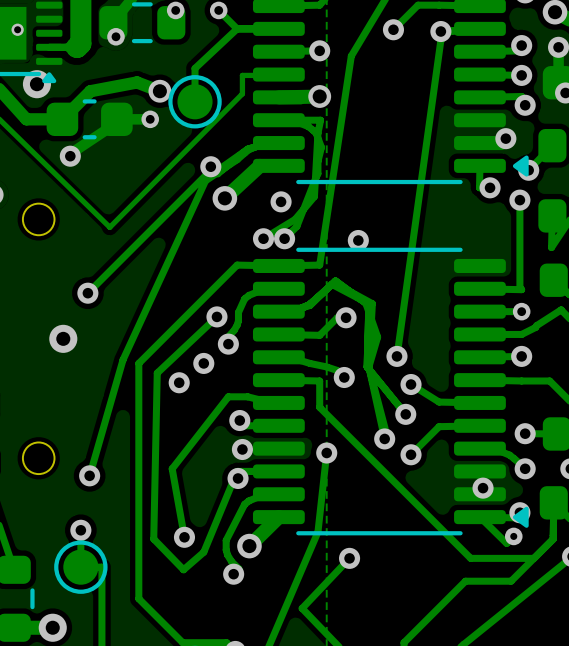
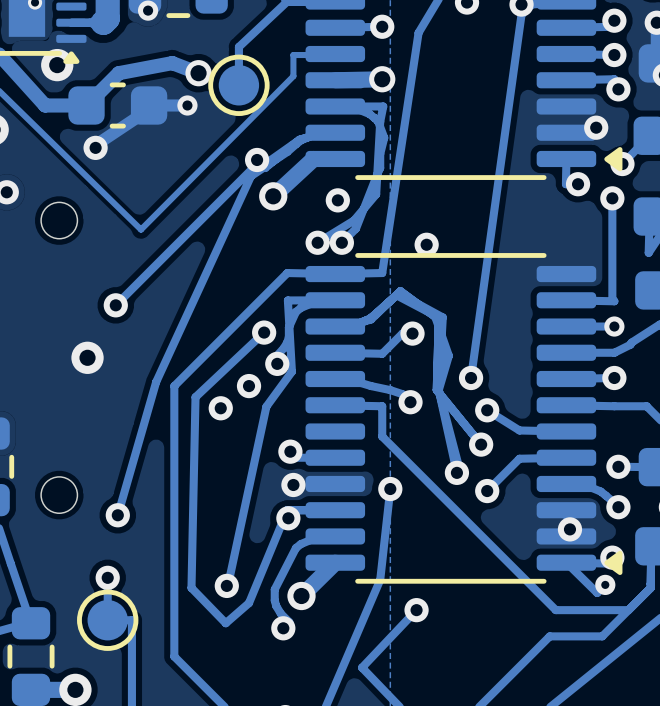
track: none -> (335, 300) (287, 300) (291, 371) (266, 406) (227, 588)
track: (278, 404) (247, 396) (228, 396) (172, 468) (184, 537) -> none

